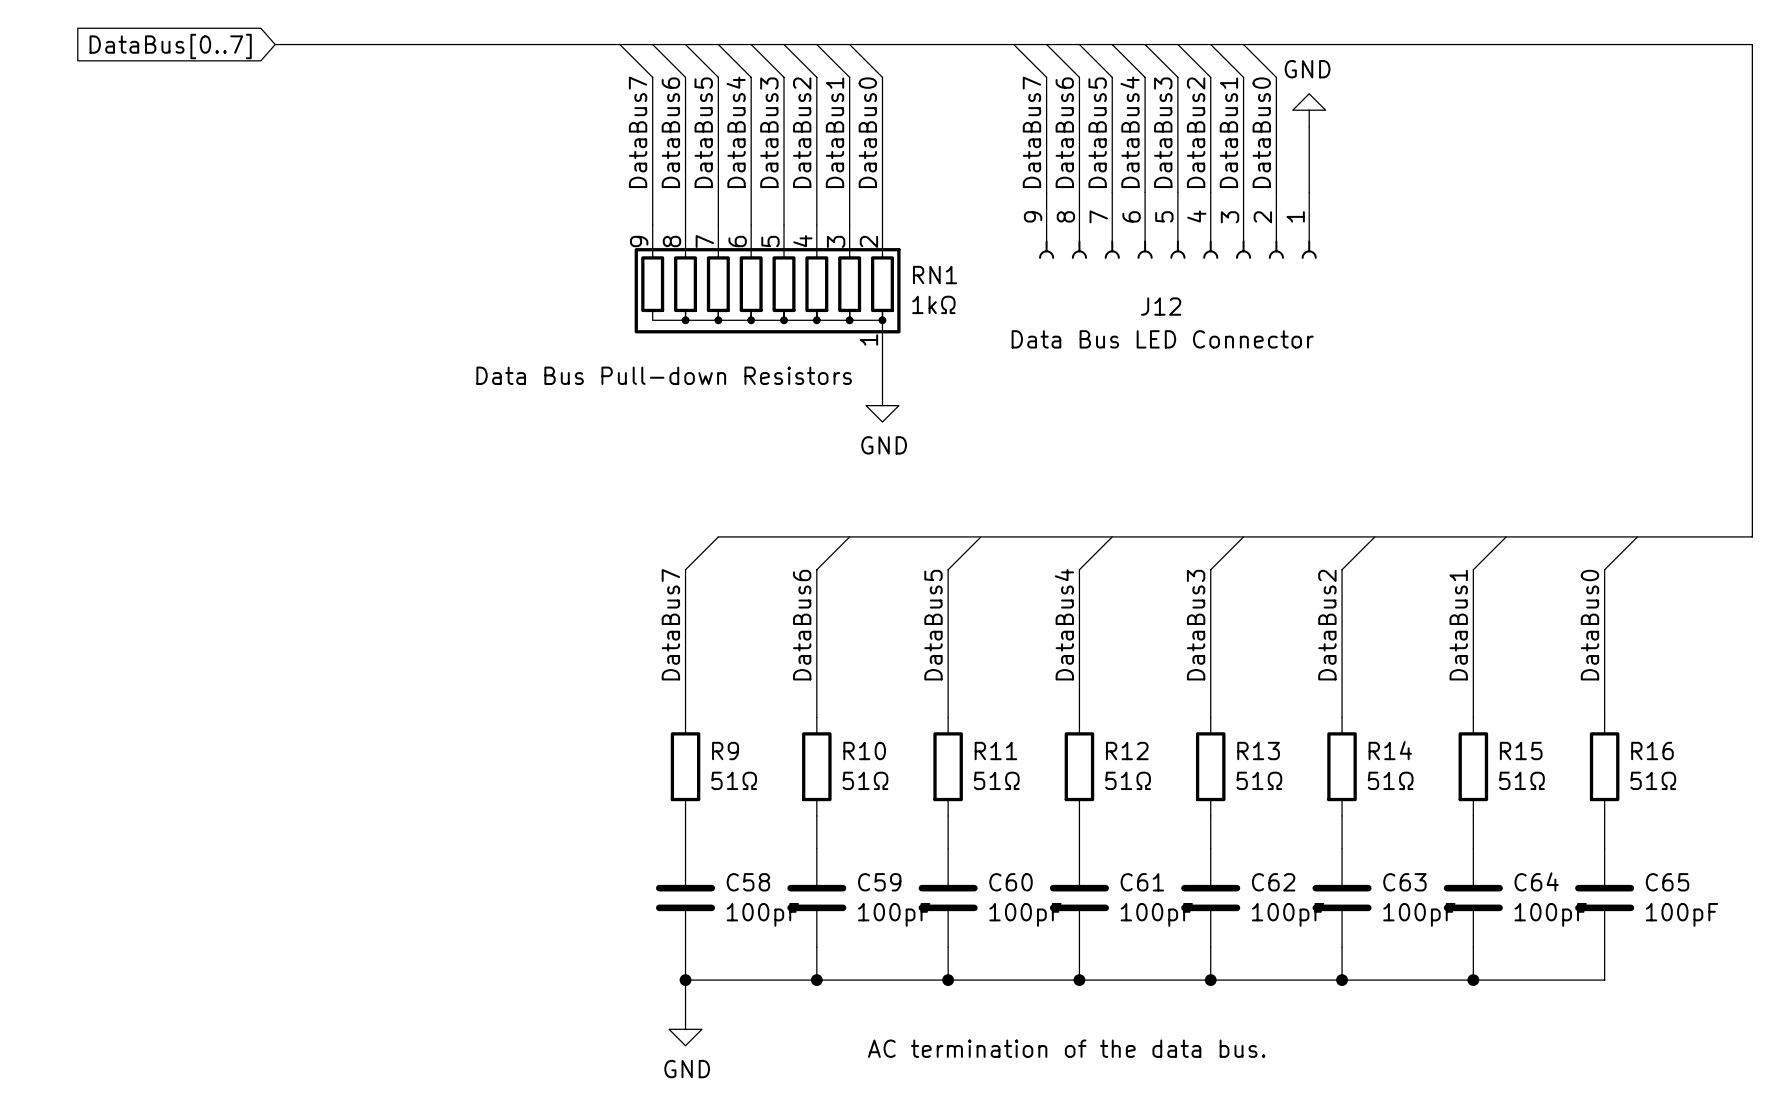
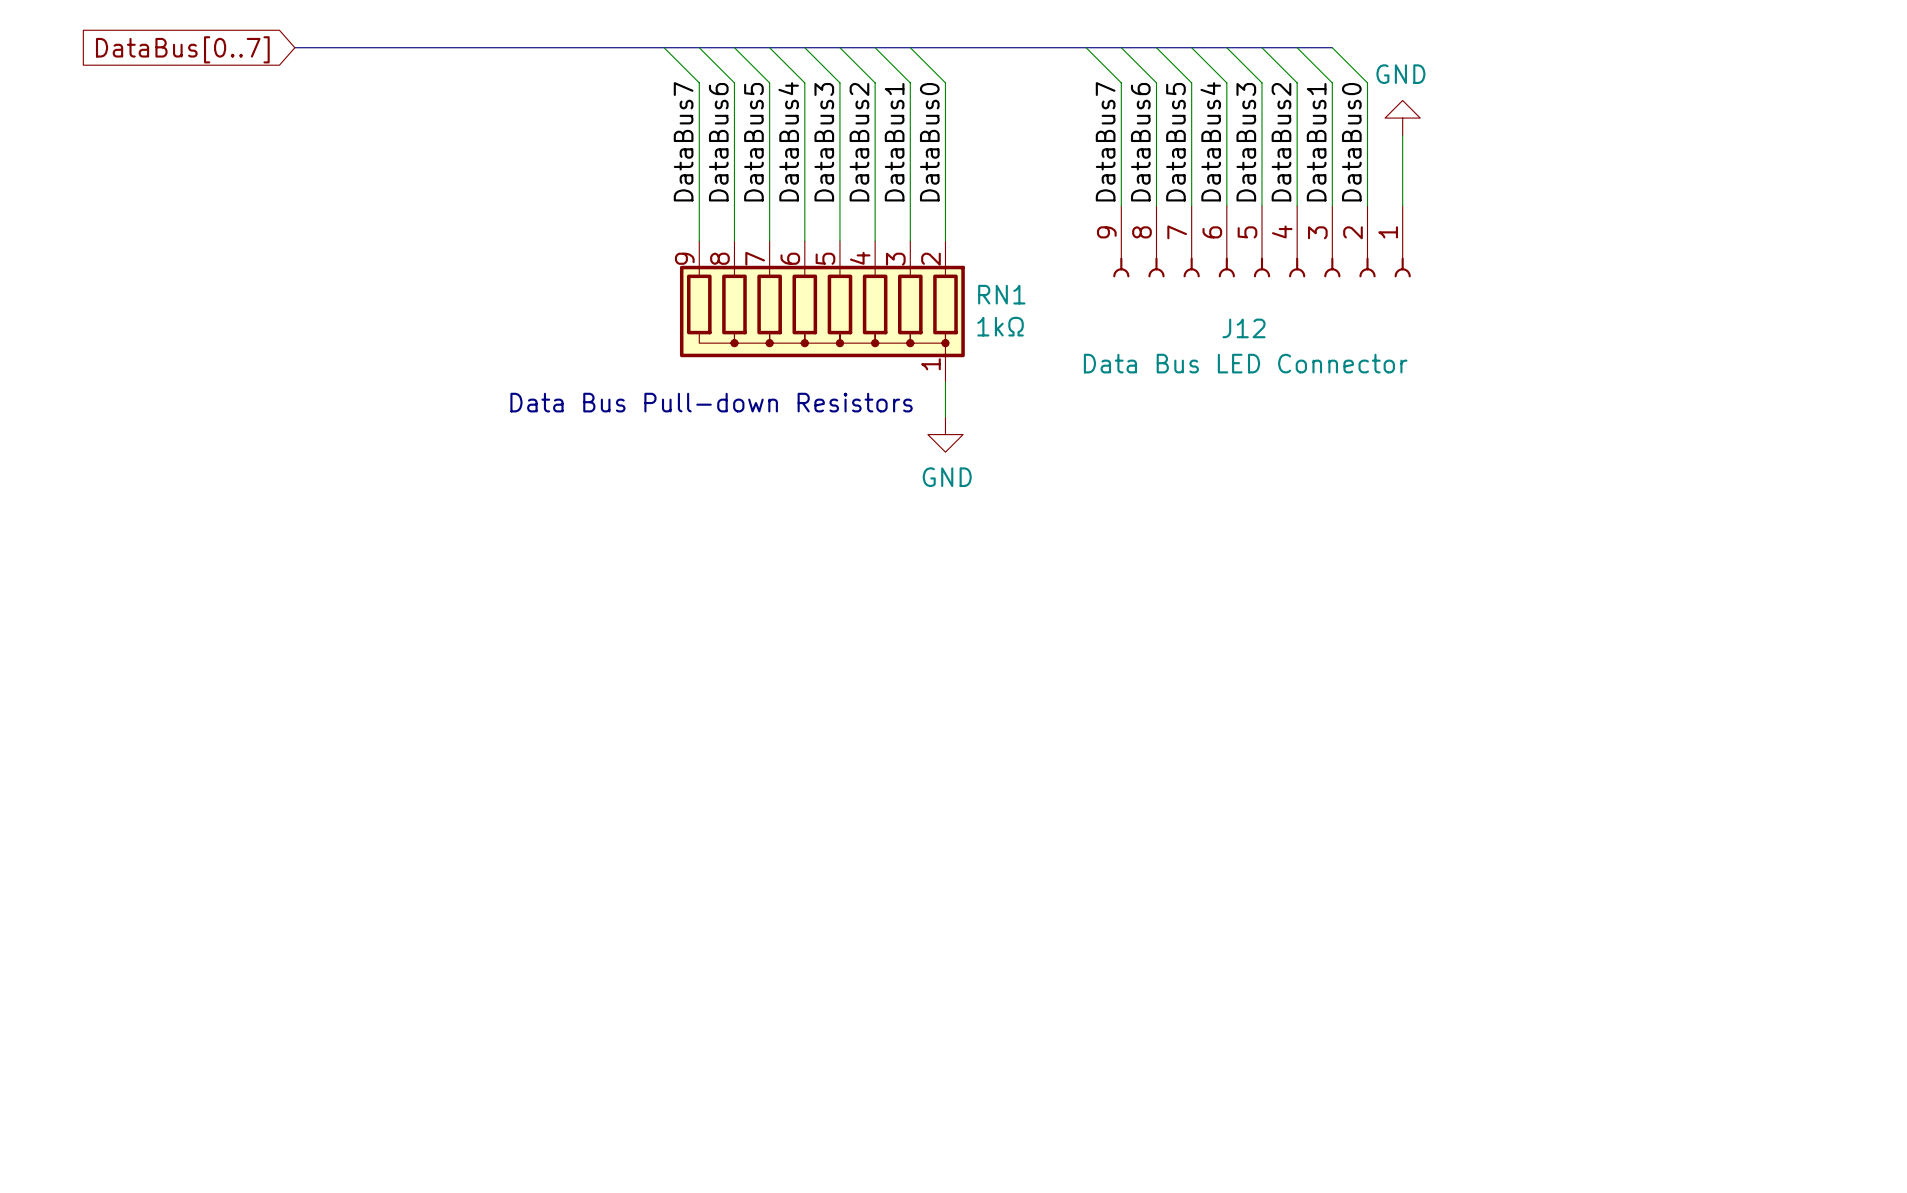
bus: (1243, 44) (1752, 44) (1752, 536) (718, 536) -> none
wire: (718, 536) (685, 569) (685, 717) -> none
wire: (849, 536) (816, 569) (816, 717) -> none
wire: (980, 536) (948, 569) (948, 717) -> none
wire: (1112, 536) (1079, 569) (1079, 717) -> none
wire: (1243, 536) (1210, 569) (1210, 717) -> none
wire: (1374, 536) (1342, 569) (1342, 717) -> none
wire: (1506, 536) (1473, 569) (1473, 717) -> none
wire: (1637, 536) (1604, 569) (1604, 717) -> none
label: DataBus7 (670, 624) -> none
label: DataBus4 (1064, 624) -> none
label: DataBus6 (802, 625) -> none
label: DataBus5 (933, 625) -> none
label: DataBus3 (1196, 625) -> none
label: DataBus2 (1327, 625) -> none
label: DataBus1 (1458, 625) -> none
label: DataBus0 (1589, 625) -> none
R9: 51Ω (685, 766) -> none
R10: 51Ω (816, 766) -> none
R11: 51Ω (948, 766) -> none
R12: 51Ω (1079, 766) -> none
R13: 51Ω (1210, 766) -> none
R14: 51Ω (1342, 766) -> none
R15: 51Ω (1473, 766) -> none
R16: 51Ω (1604, 766) -> none
wire: (685, 815) (685, 848) -> none
wire: (816, 815) (816, 848) -> none
wire: (948, 815) (948, 848) -> none
wire: (1079, 815) (1079, 848) -> none
wire: (1210, 815) (1210, 848) -> none
wire: (1342, 815) (1342, 848) -> none
wire: (1473, 815) (1473, 848) -> none
wire: (1604, 815) (1604, 848) -> none
C58: 100pF (685, 898) -> none
C59: 100pF (816, 898) -> none
C60: 100pF (948, 898) -> none
C61: 100pF (1079, 898) -> none
C62: 100pF (1210, 898) -> none
C63: 100pF (1342, 898) -> none
C64: 100pF (1473, 898) -> none
C65: 100pF (1604, 898) -> none
wire: (685, 947) (685, 1012) -> none
wire: (816, 947) (816, 980) -> none
wire: (948, 947) (948, 980) -> none
wire: (1079, 947) (1079, 980) -> none
wire: (1210, 947) (1210, 980) -> none
wire: (1342, 947) (1342, 980) -> none
wire: (1473, 947) (1473, 980) -> none
wire: (1604, 947) (1604, 980) (685, 980) -> none
junction: (685, 980) -> none
junction: (816, 980) -> none
junction: (948, 980) -> none
junction: (1079, 980) -> none
junction: (1210, 980) -> none
junction: (1342, 980) -> none
junction: (1473, 980) -> none
power symbol: GND (685, 1029) -> none
text: AC termination of the data bus. (1066, 1048) -> none

